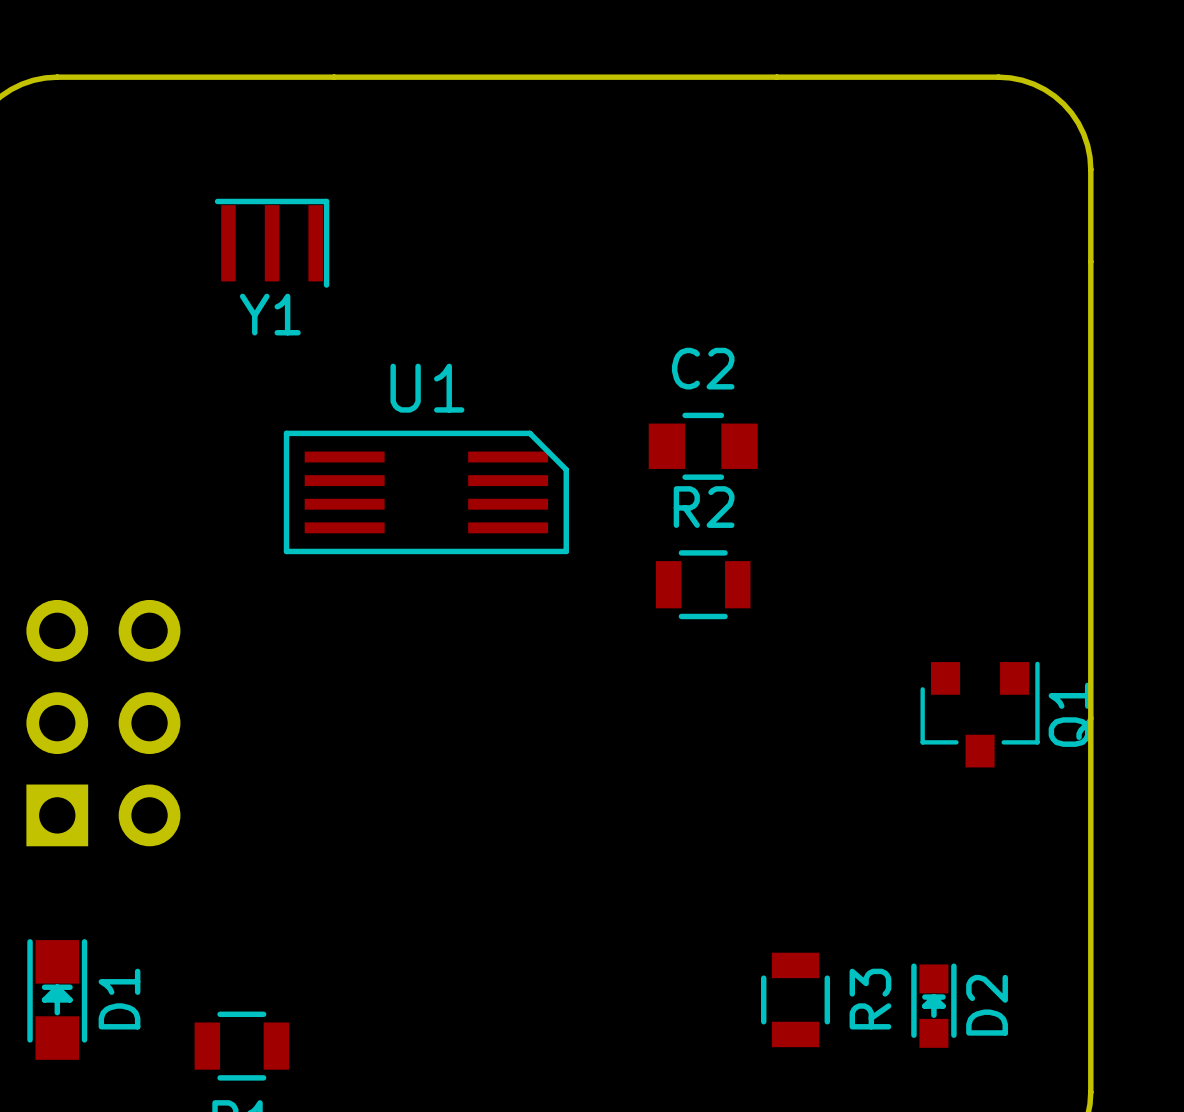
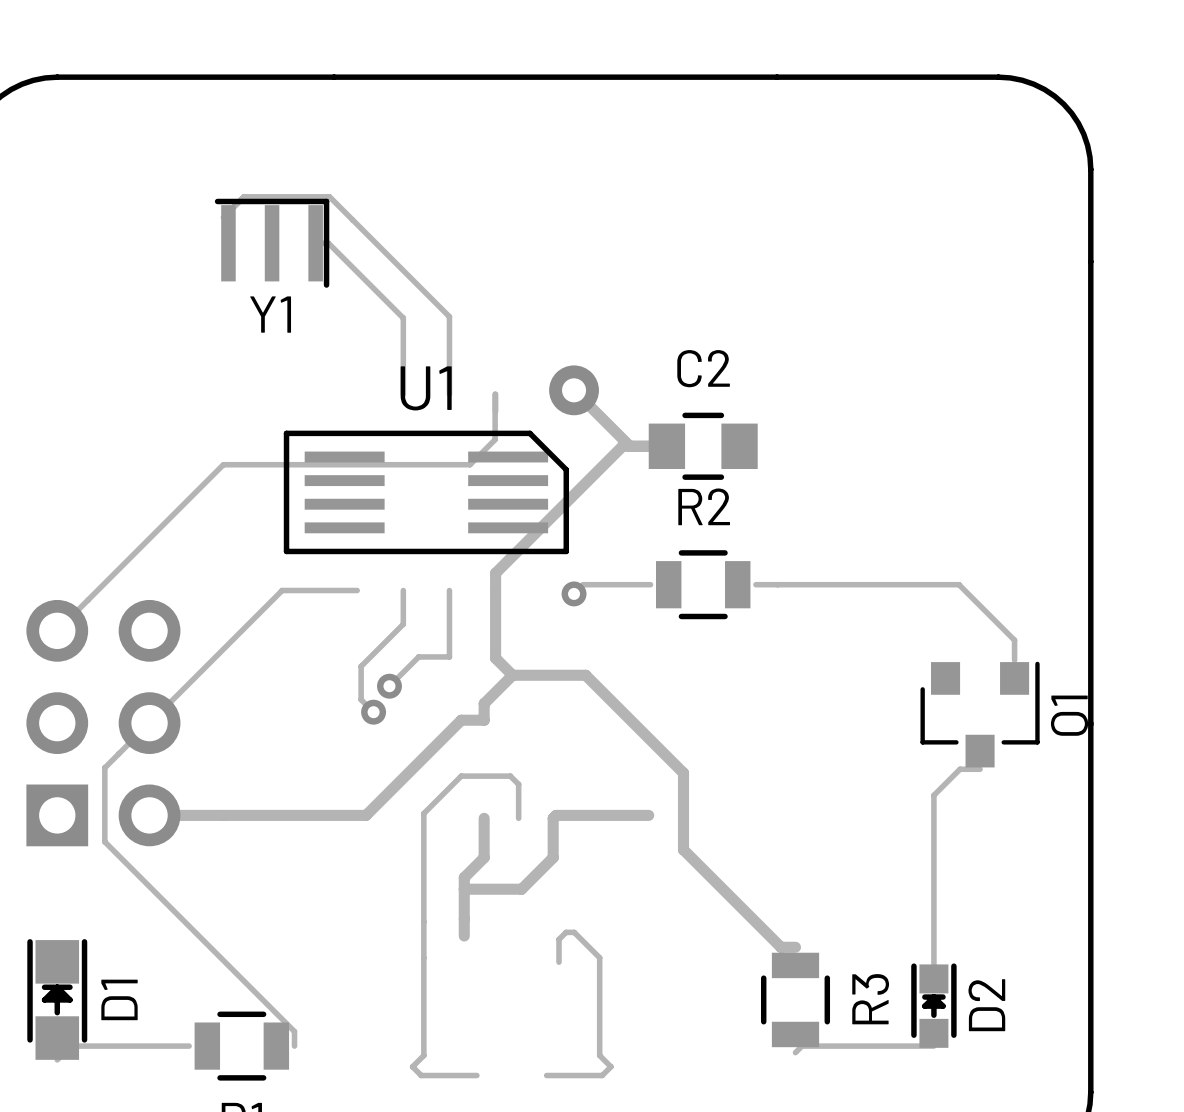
track: none -> (223, 217) (244, 196) (329, 196) (449, 316) (449, 394)
track: none -> (315, 243) (328, 243) (403, 318) (403, 394)
track: none -> (574, 390) (629, 446)
via: none -> (574, 390)
track: none -> (495, 394) (495, 439) (470, 464) (223, 464) (57, 630)
track: none -> (648, 446) (622, 446) (495, 573) (495, 658) (512, 675)
track: none -> (650, 584) (583, 584) (574, 593)
track: none -> (755, 584) (958, 584) (1014, 640) (1014, 660)
track: none -> (357, 590) (282, 590) (104, 767) (104, 841) (294, 1031) (294, 1046)
track: none -> (403, 590) (403, 624) (361, 666) (361, 699) (373, 712)
track: none -> (449, 590) (449, 656) (418, 656) (389, 686)
via: none -> (574, 593)
track: none -> (512, 675) (585, 675) (683, 773) (683, 849) (780, 947) (795, 947)
track: none -> (512, 675) (484, 703) (484, 720) (461, 720) (366, 815) (149, 815)
via: none -> (389, 686)
via: none -> (373, 712)
track: none -> (980, 769) (959, 769) (933, 795) (933, 966)
track: none -> (648, 815) (556, 815) (553, 818) (553, 857) (521, 889) (464, 889)
track: none -> (484, 818) (484, 857) (464, 877) (464, 936)
track: none -> (518, 818) (518, 784) (510, 776) (461, 776) (423, 813) (423, 1055) (412, 1066) (421, 1075) (476, 1075)
track: none -> (558, 962) (558, 939) (566, 932) (574, 932) (599, 957) (599, 1055) (610, 1066) (602, 1075) (546, 1075)
track: none -> (189, 1046) (71, 1046) (57, 1059)
track: none -> (933, 1046) (802, 1046) (795, 1052)

